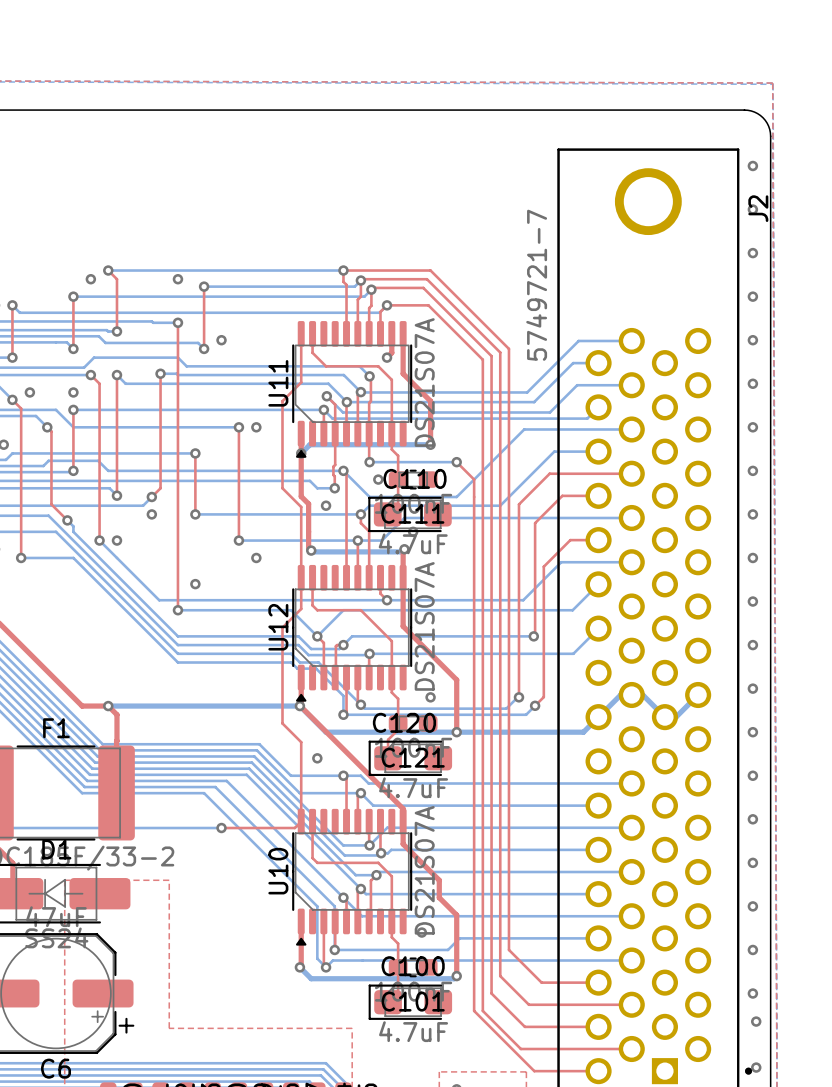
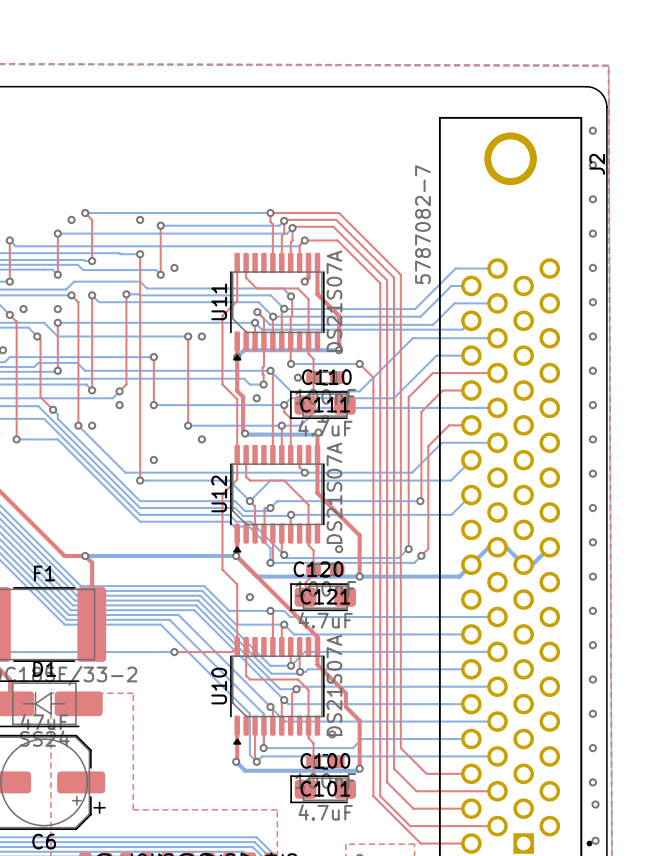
J2 value: 5749721-7 (536, 285) -> 5787082-7 (422, 224)

